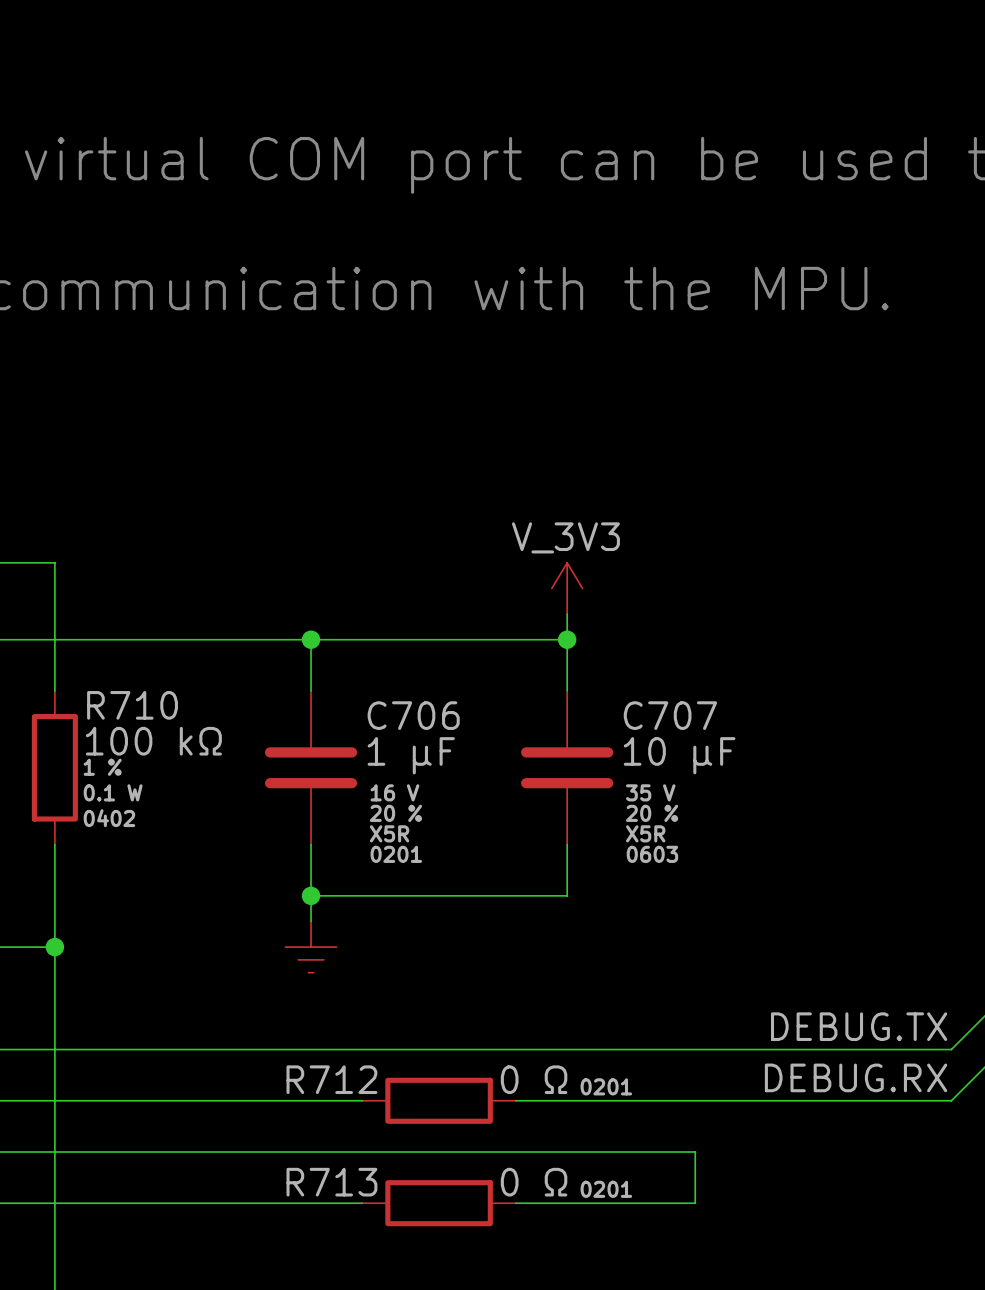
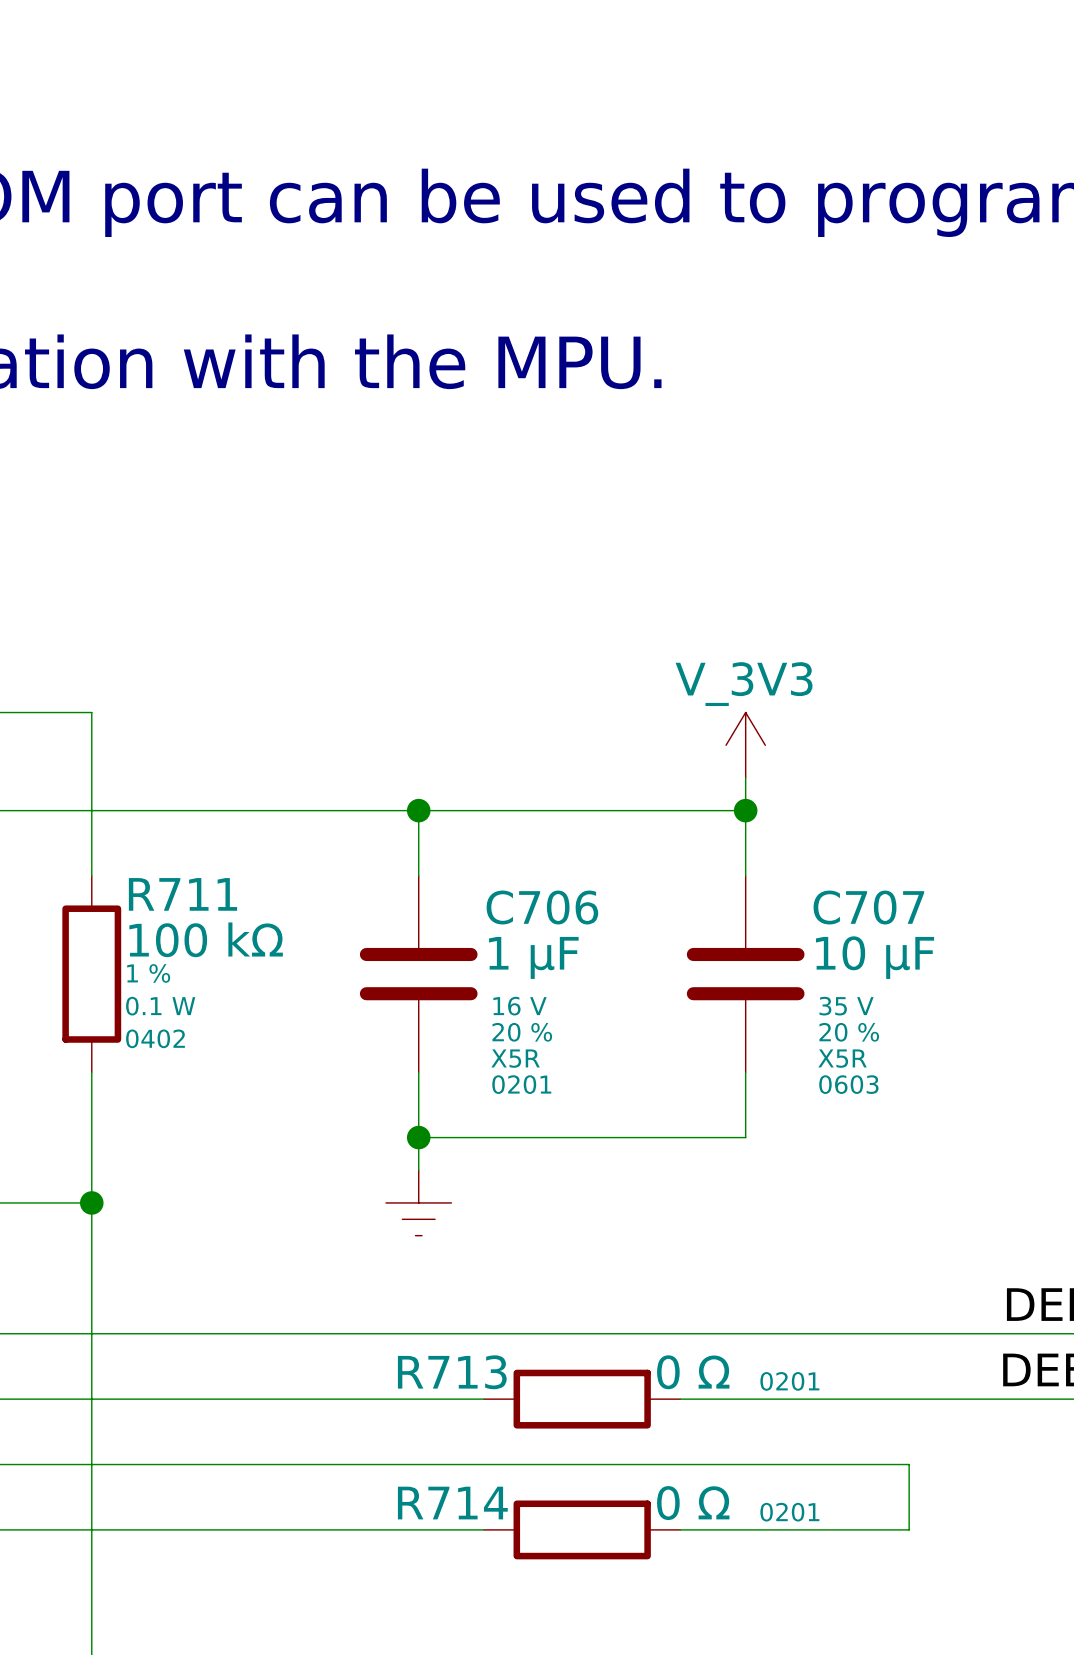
R710 name: R710 (132, 705) -> R711 (182, 894)
R712 name: R712 (331, 1079) -> R713 (452, 1372)
R713 name: R713 (331, 1182) -> R714 (452, 1503)

